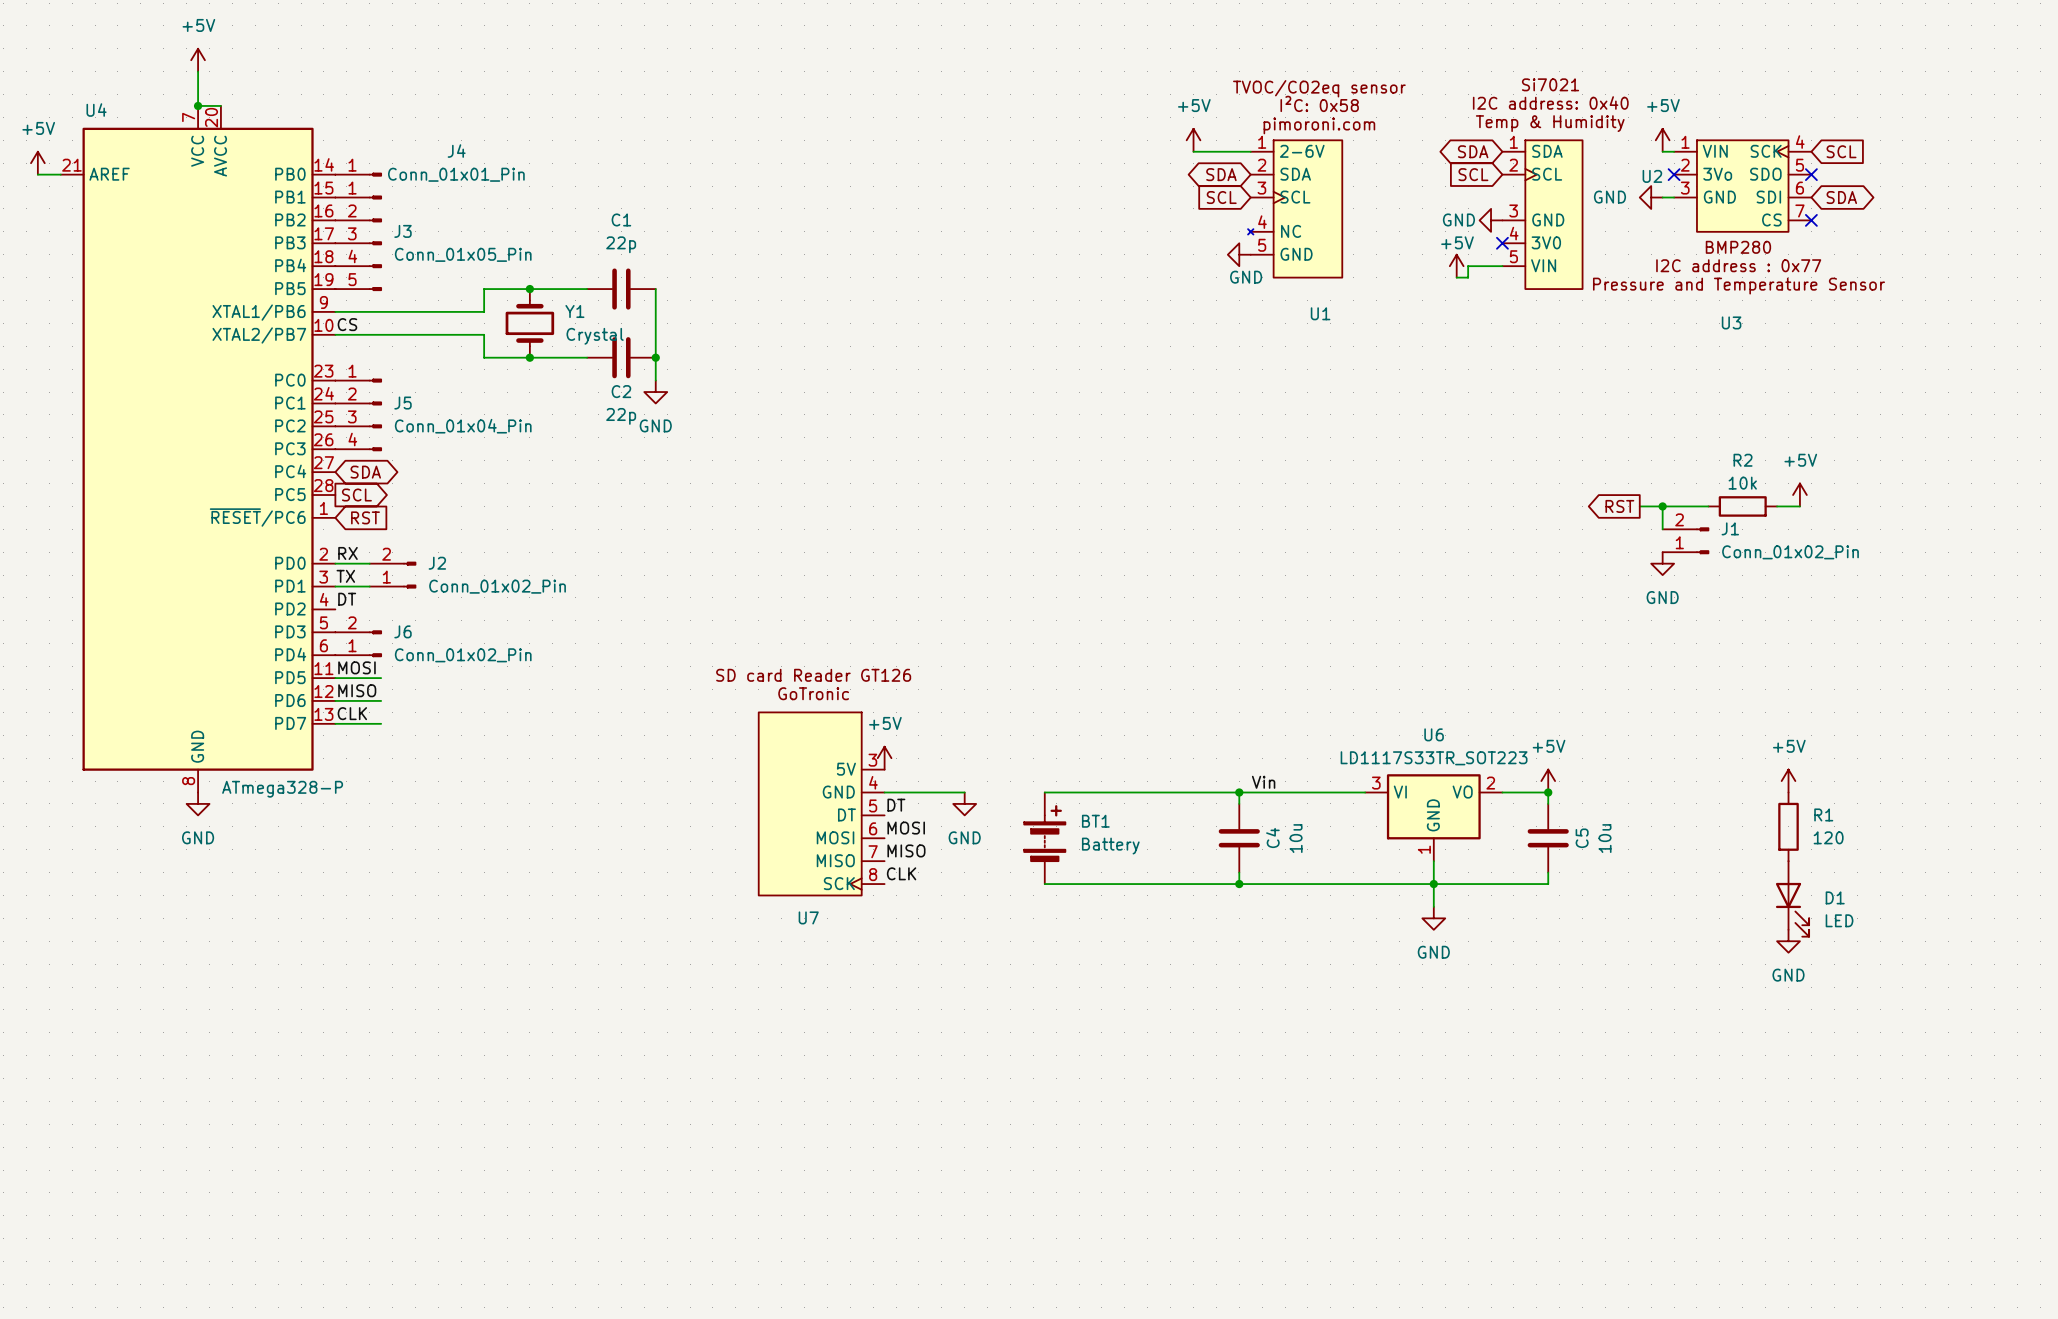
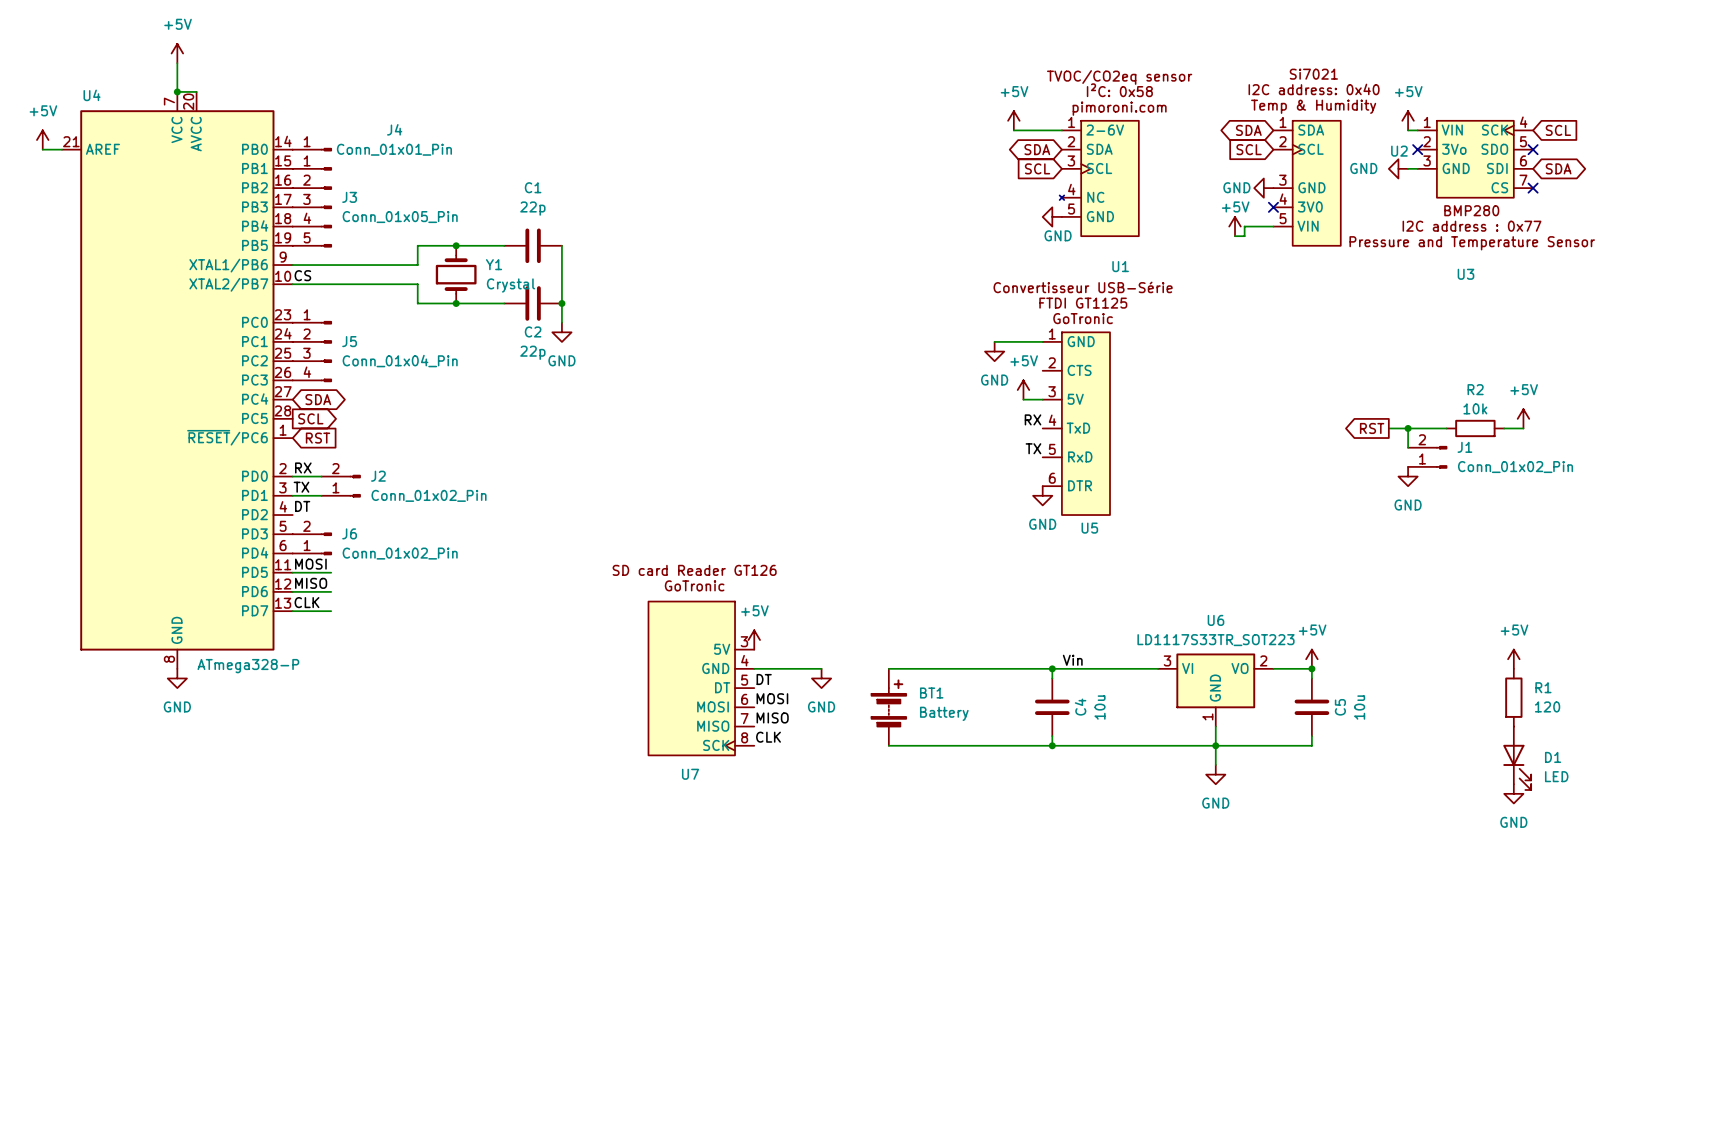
wire: none -> (994, 341) (1042, 341)
power symbol: none -> GND (994, 351)
power symbol: none -> +5V (1023, 390)
wire: none -> (1023, 399) (1042, 399)
label: none -> RX (1033, 419)
U5: none -> (1076, 423)
label: none -> TX (1033, 448)
power symbol: none -> GND (1042, 495)

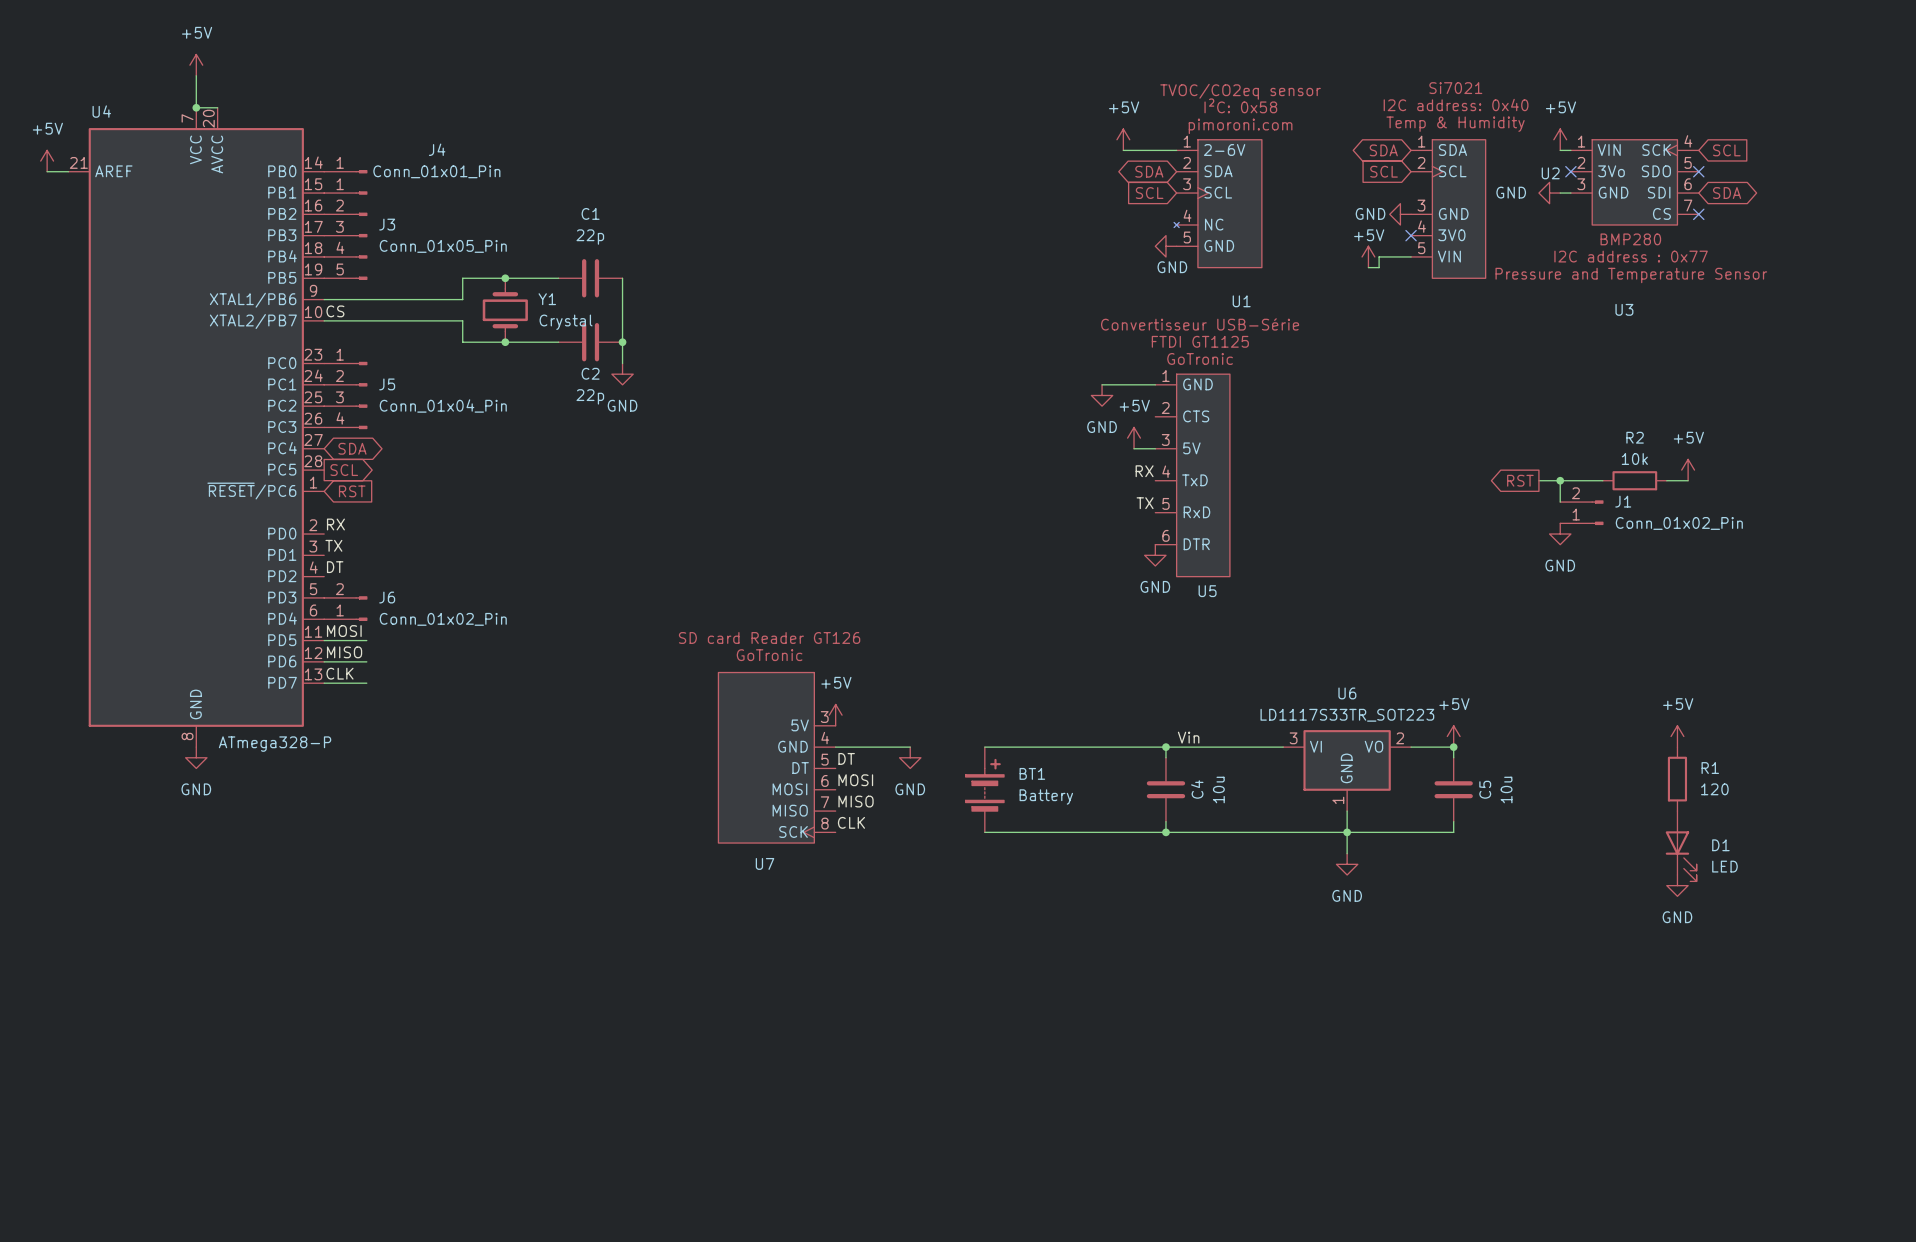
wire: (292, 476) (321, 476) -> none
J2: Conn_01x02_Pin (341, 486) -> none
wire: (292, 495) (321, 495) -> none

